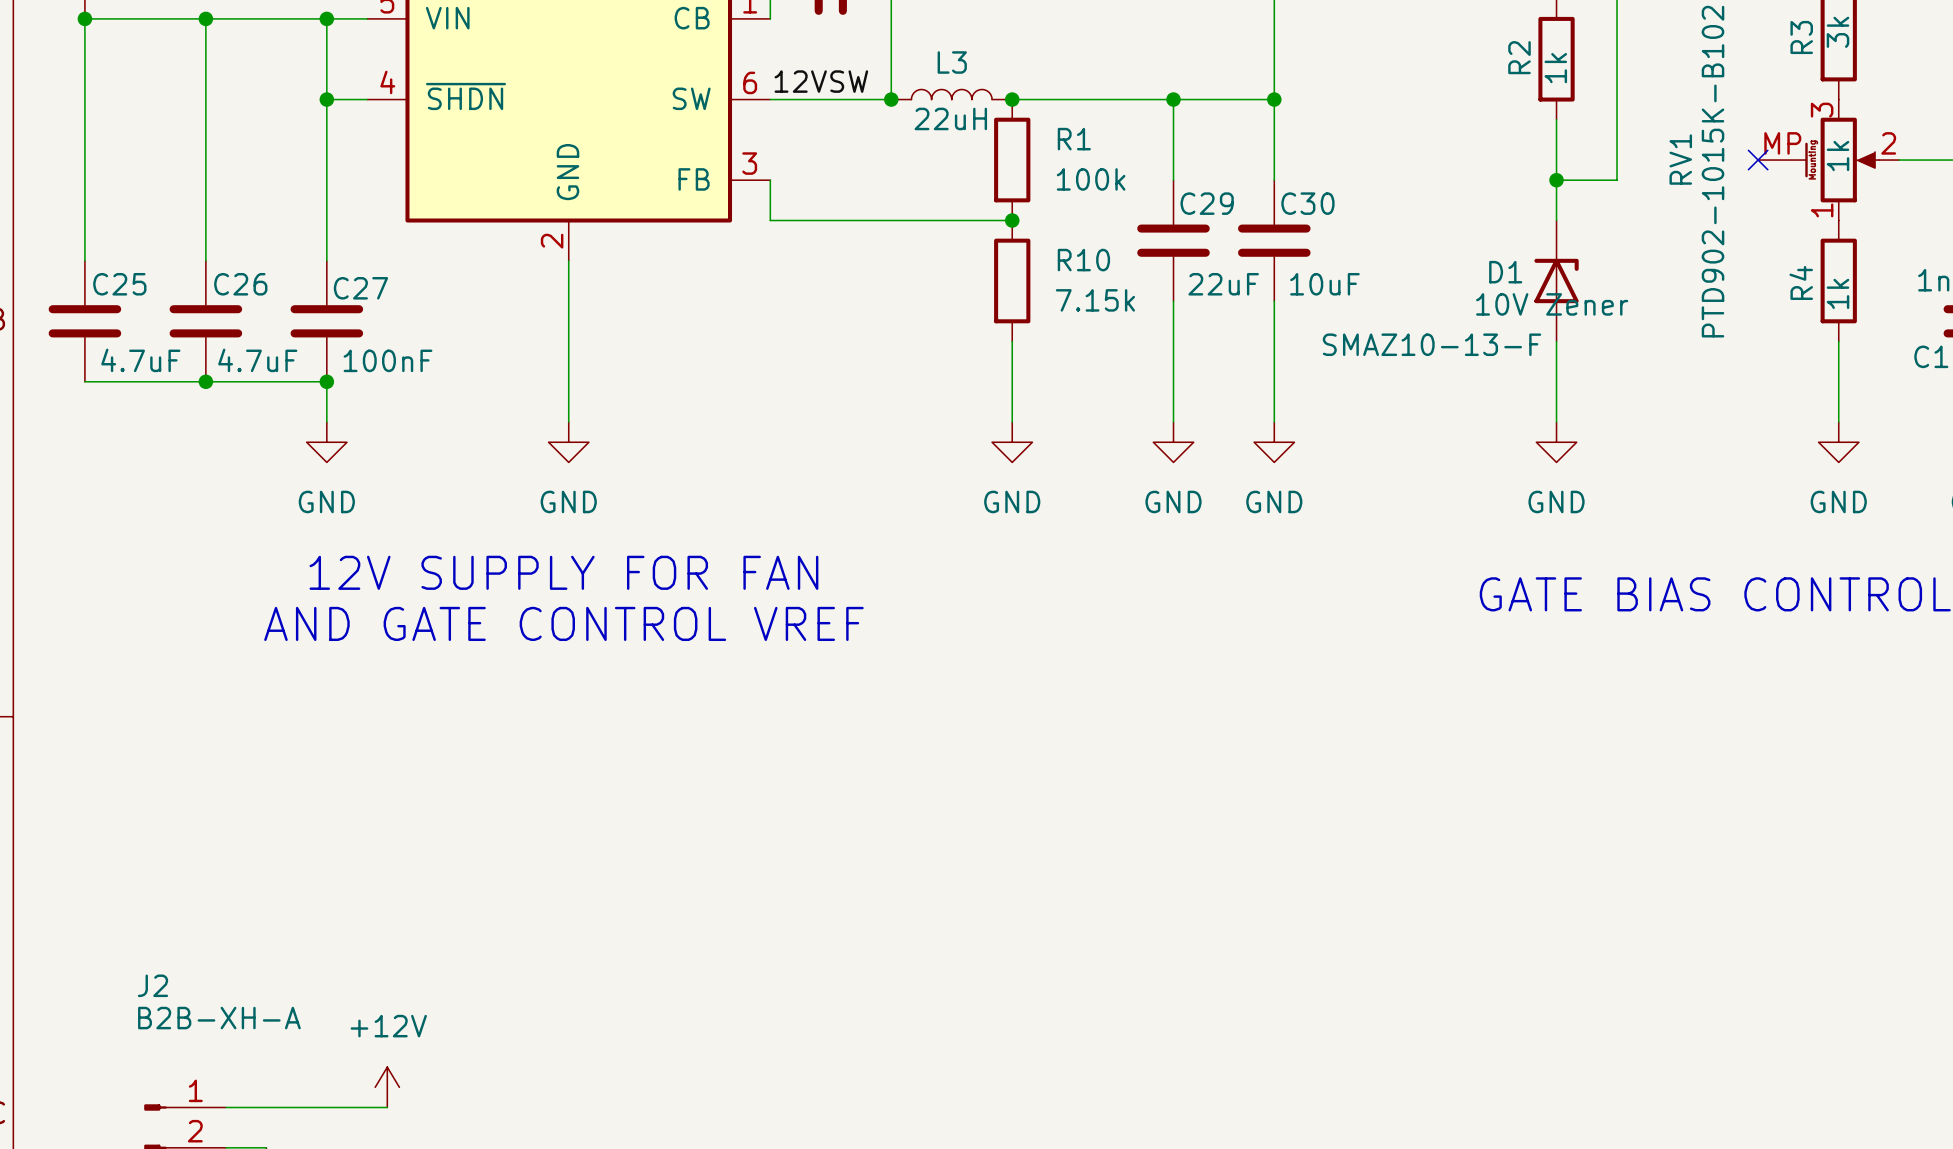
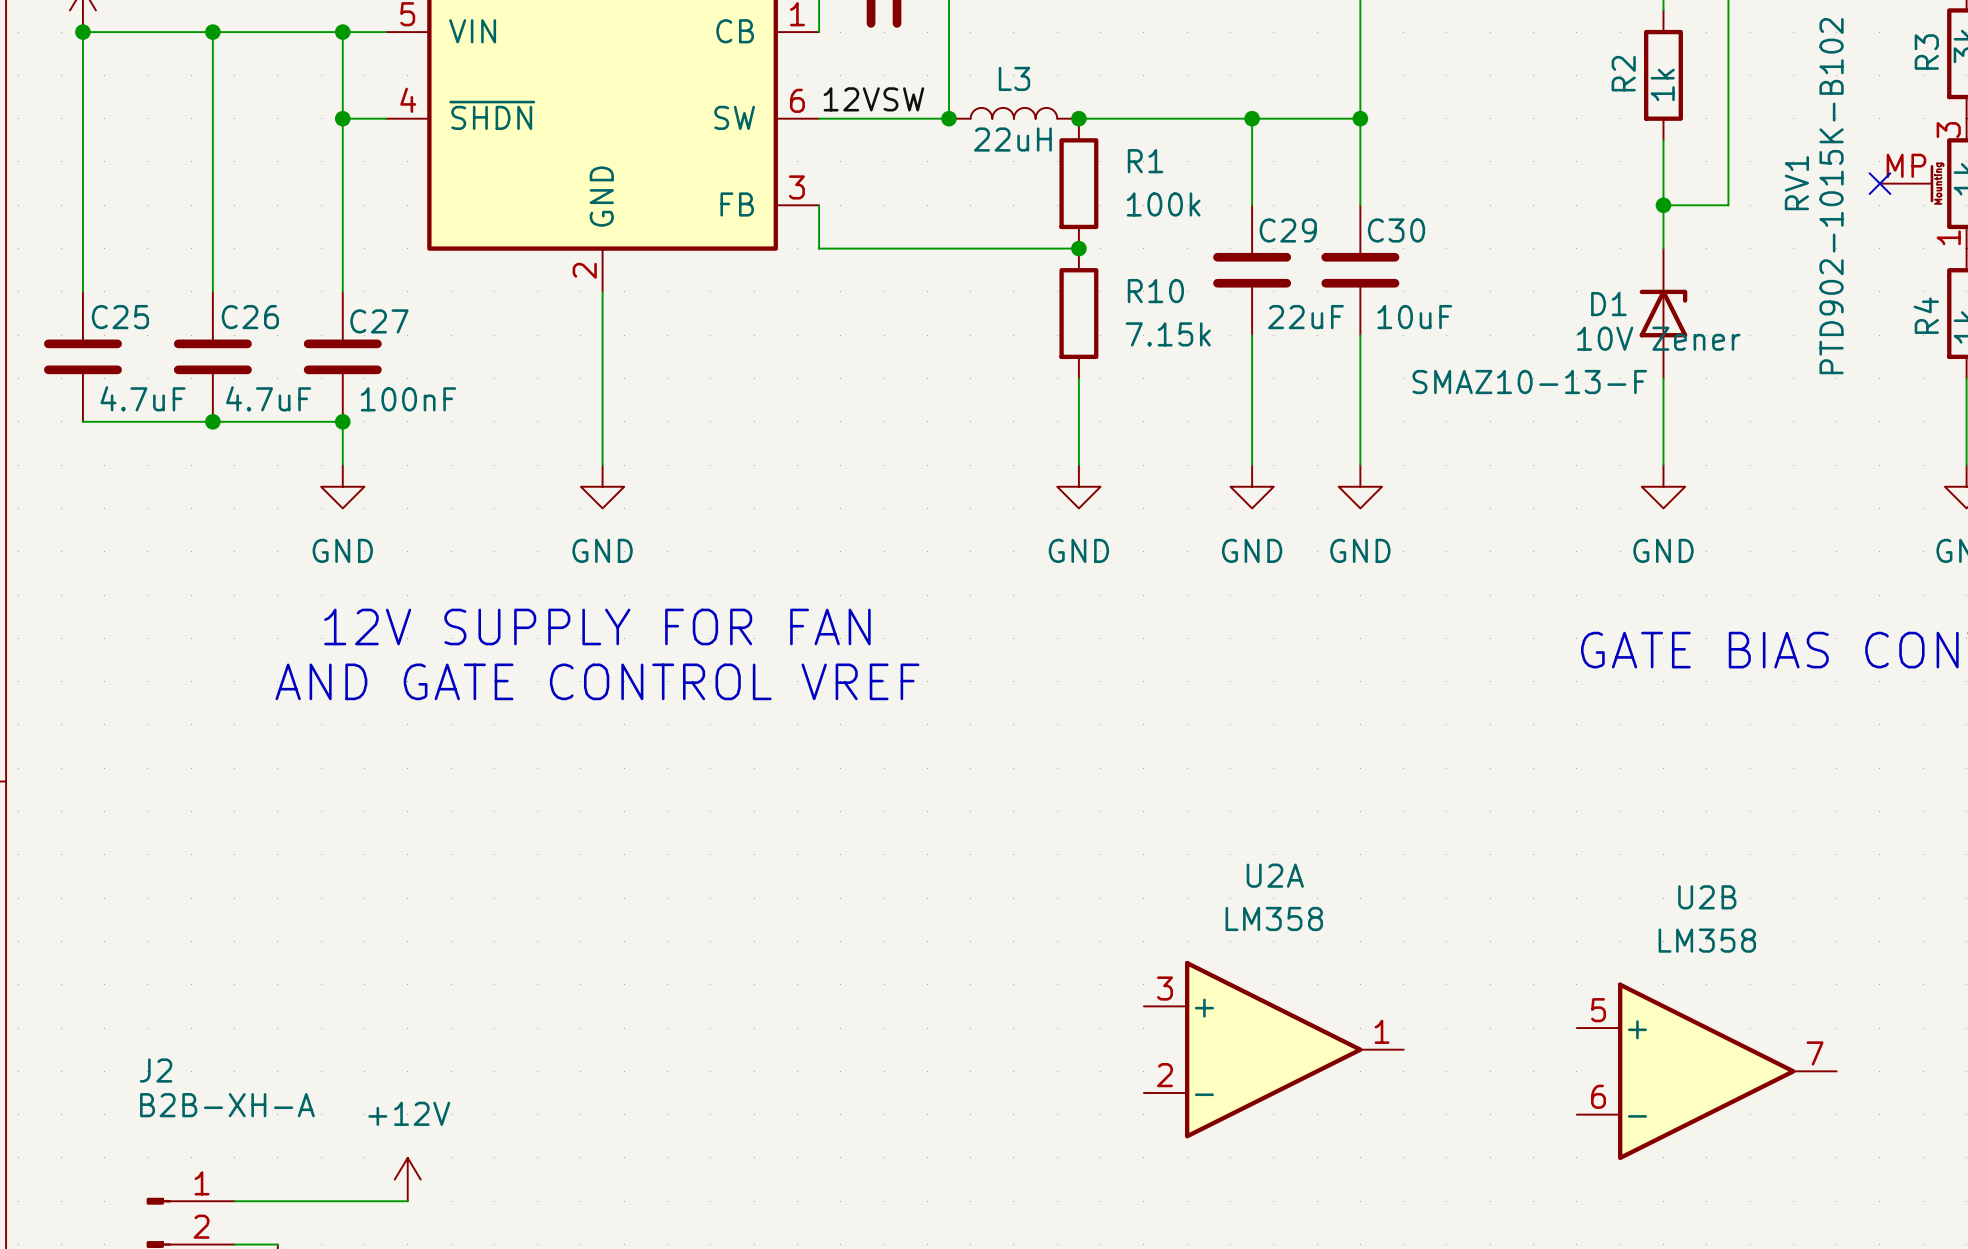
U2A: none -> LM358 (1273, 1049)
U2B: none -> LM358 (1706, 1071)

